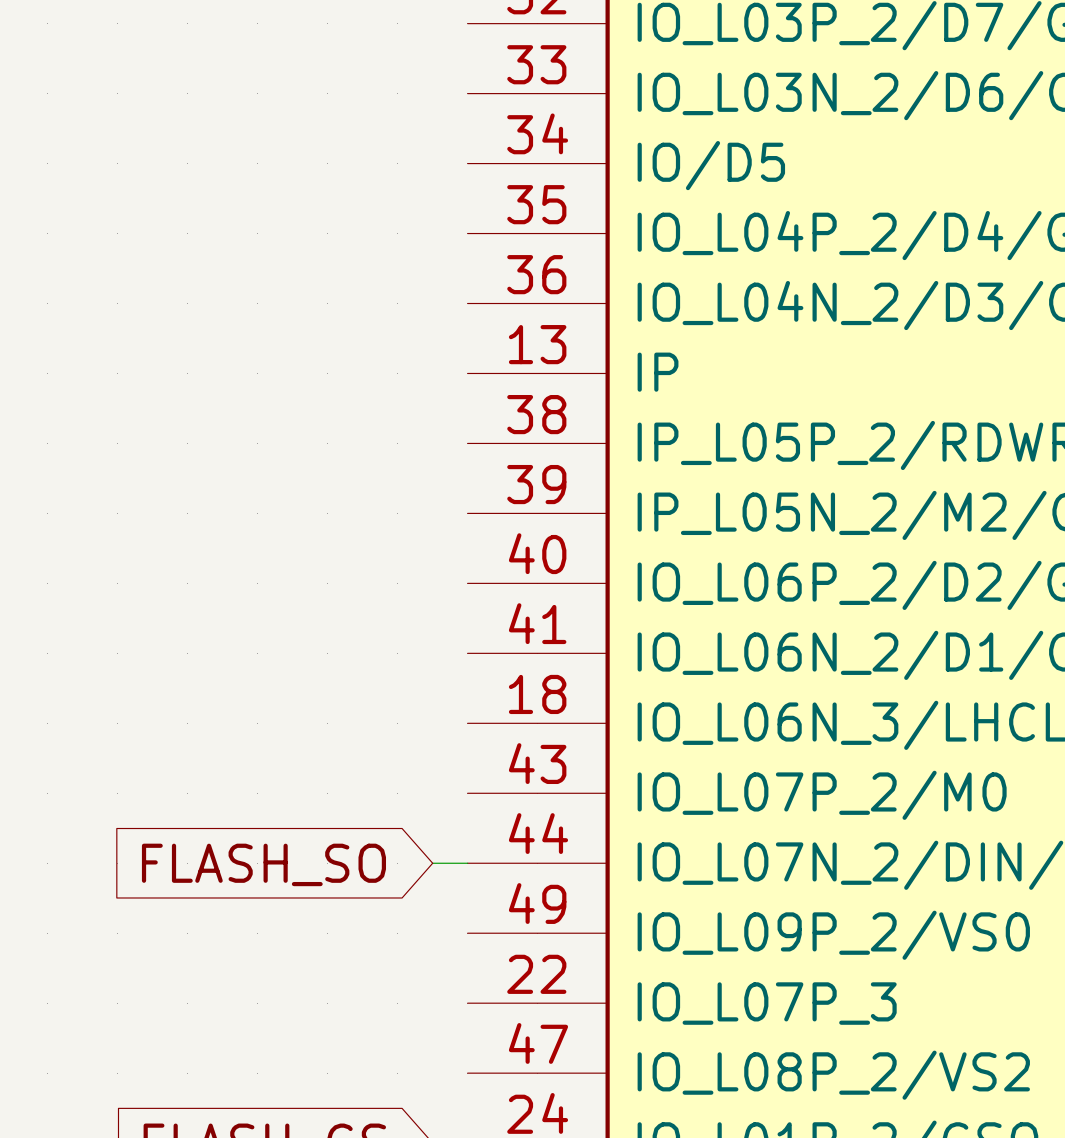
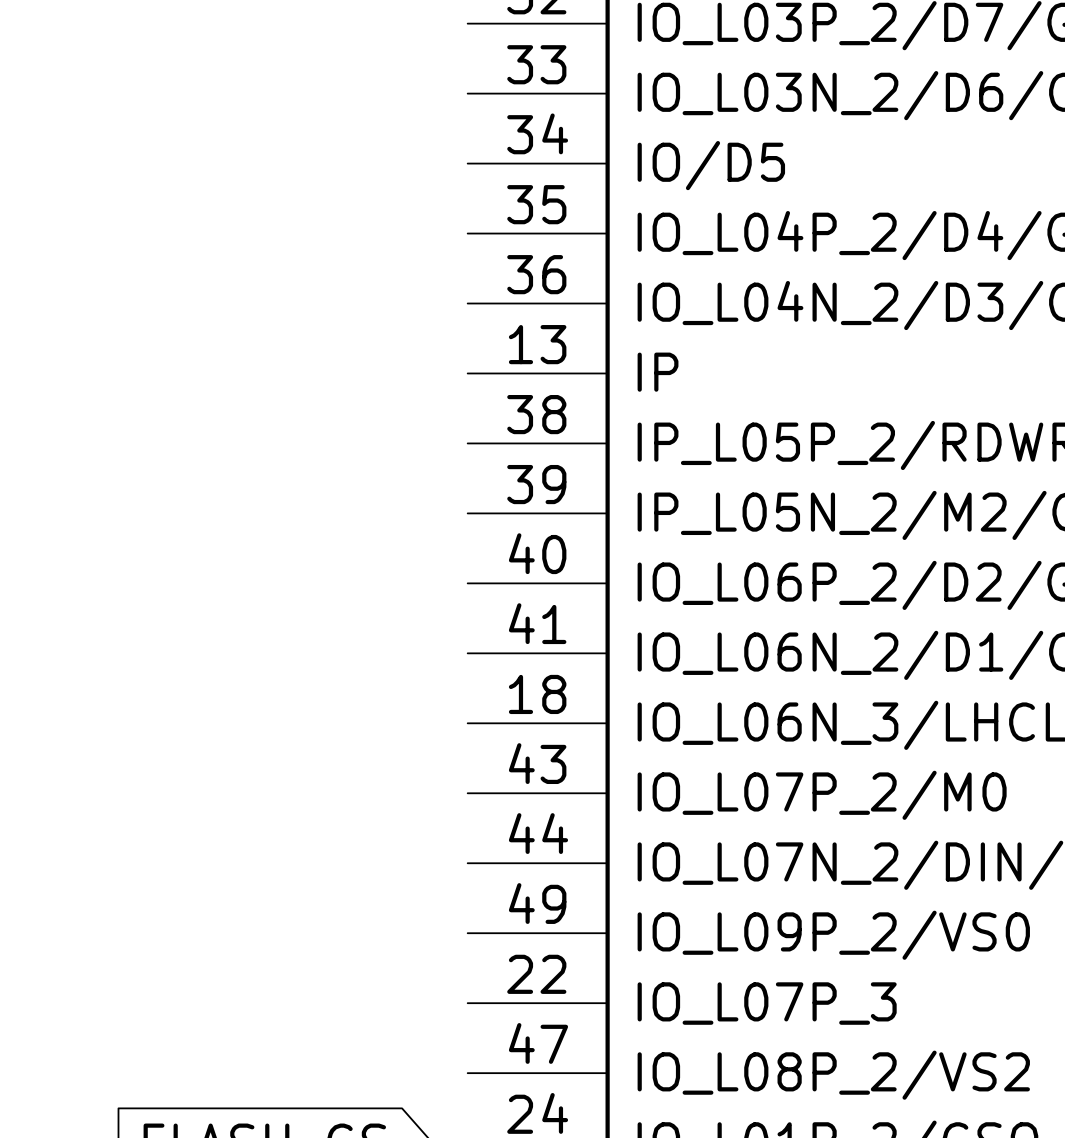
wire: (432, 863) (467, 863) -> none
global label: FLASH_SO (263, 864) -> none

